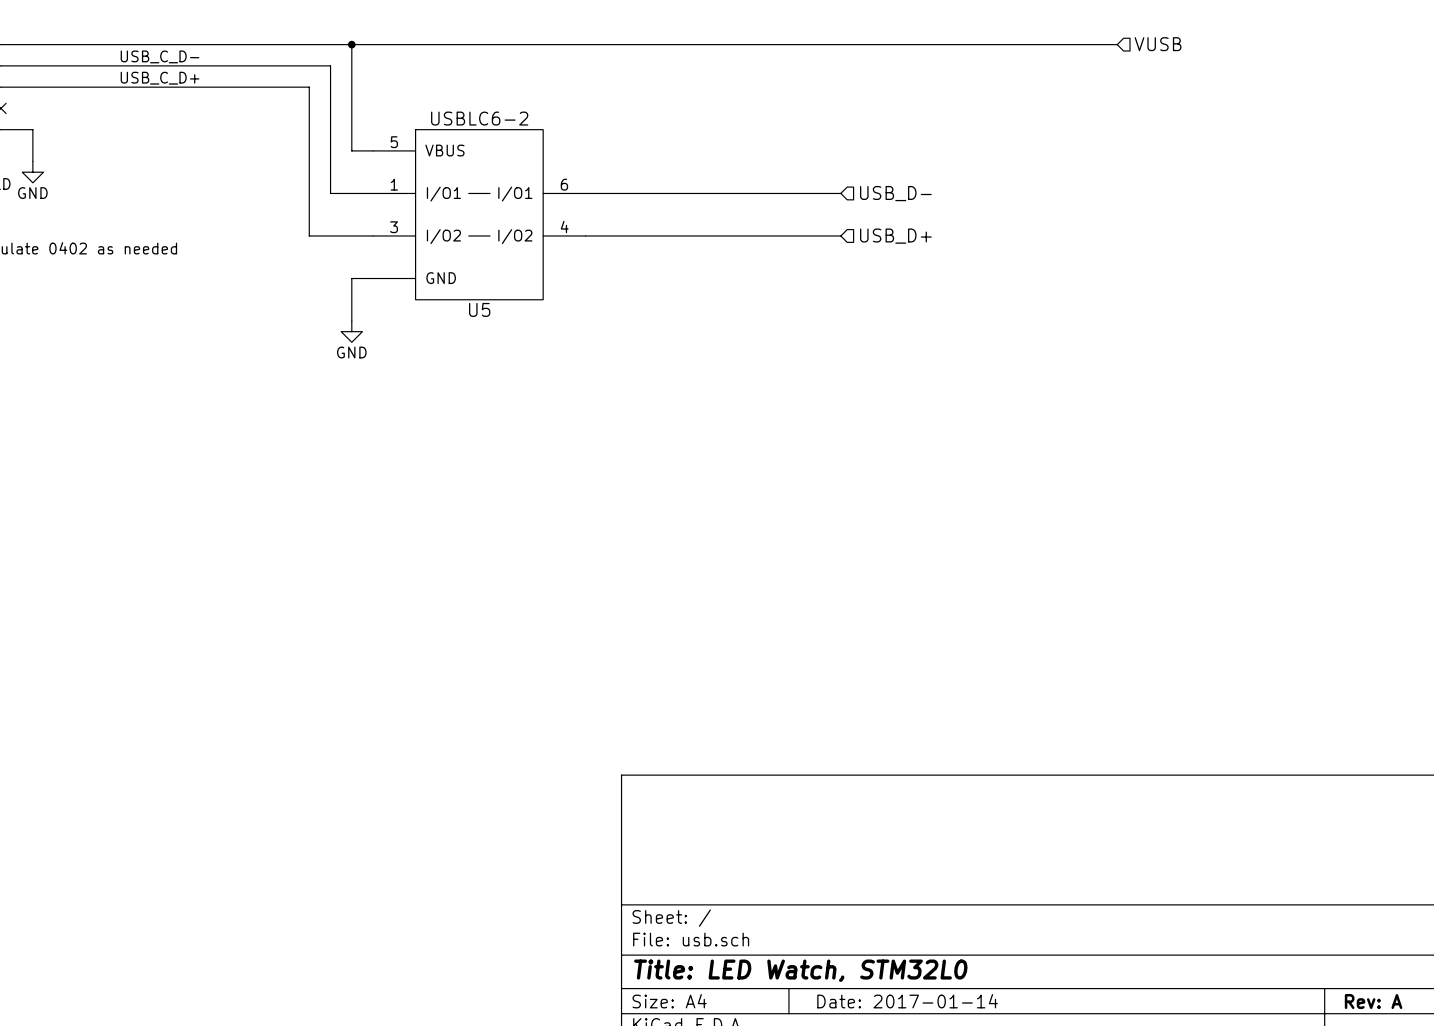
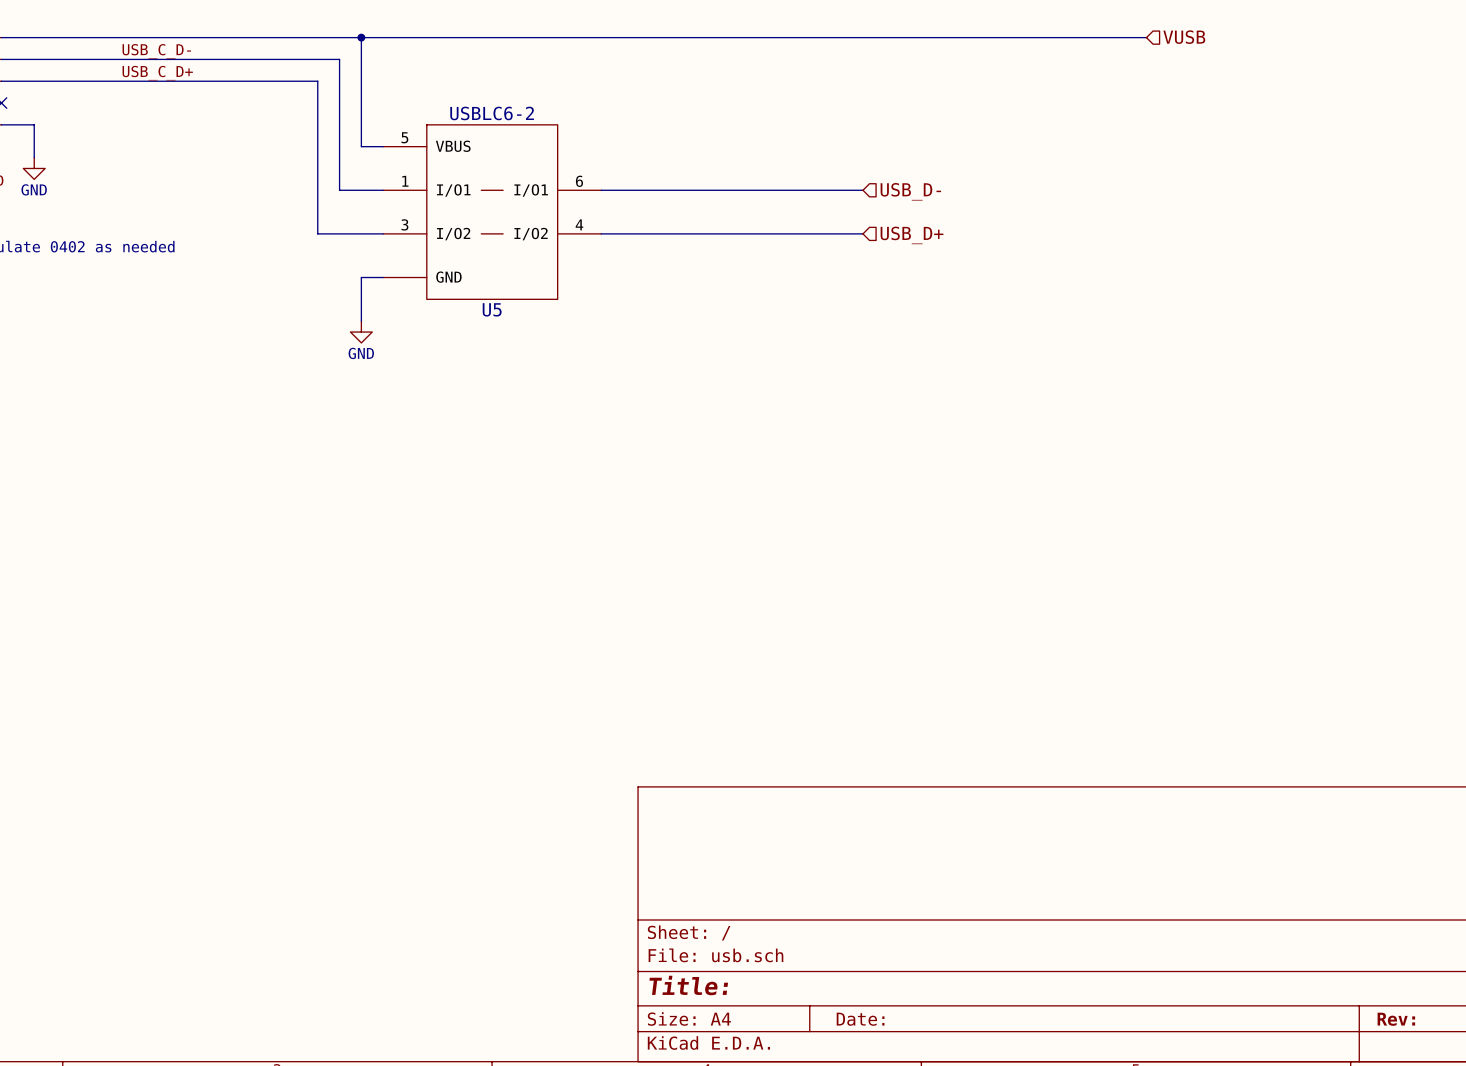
title block: Title: LED Watch, STM32L0 (800, 970) -> Title: (688, 985)
title block: Date: 2017-01-14 (907, 1001) -> Date: (860, 1019)
title block: Rev: A (1373, 1001) -> Rev: (1396, 1019)

